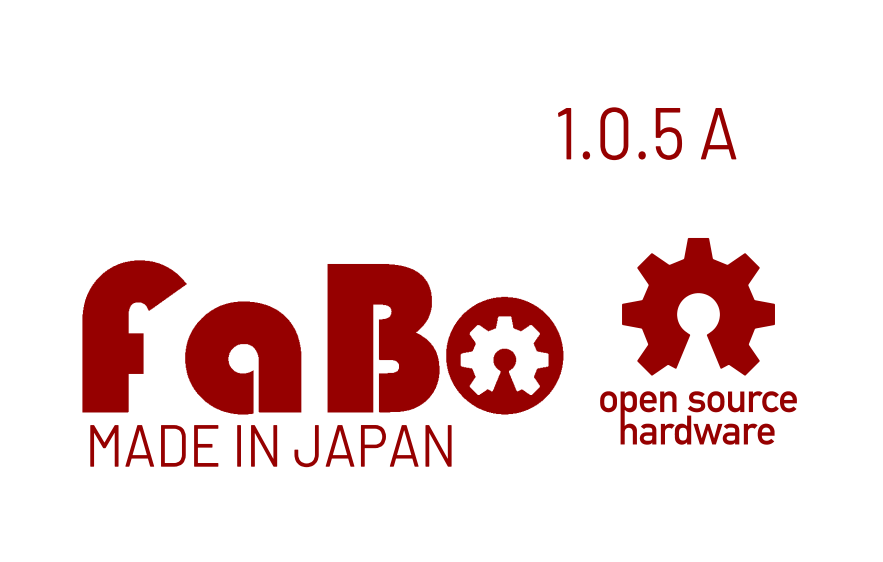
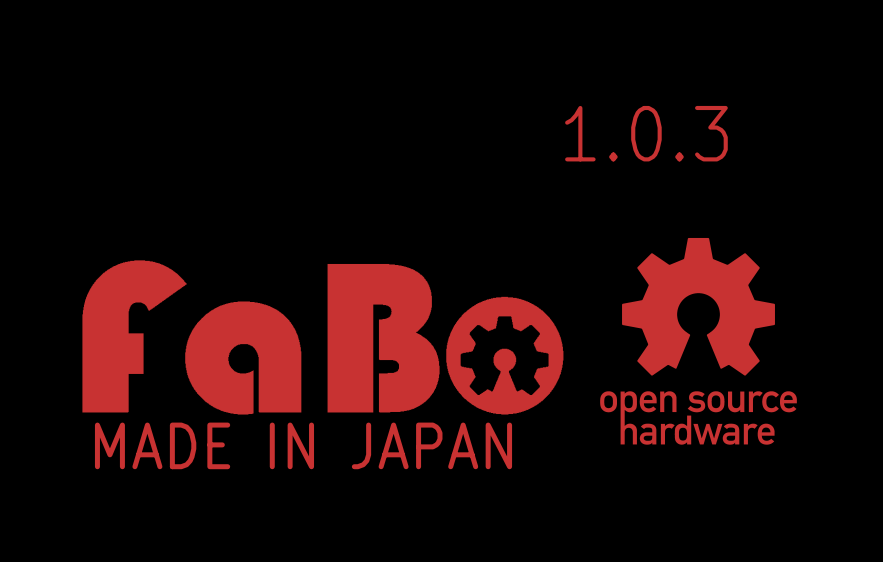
text: 1.0.5 A (647, 133) -> 1.0.3 (646, 133)

